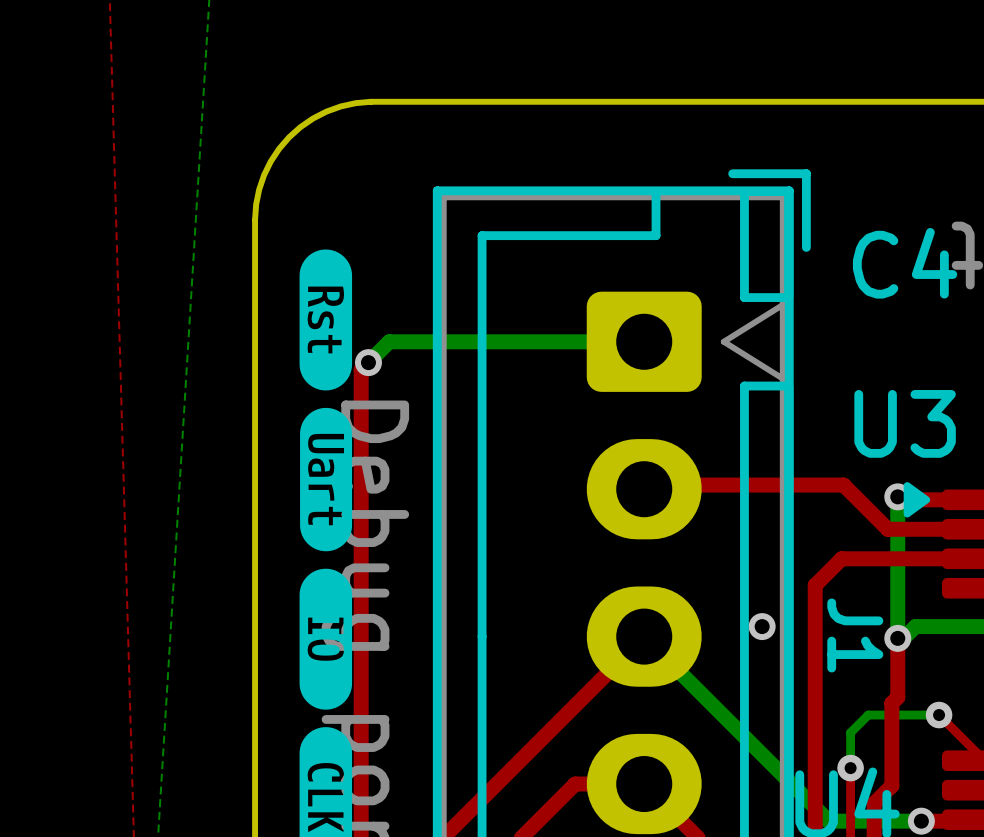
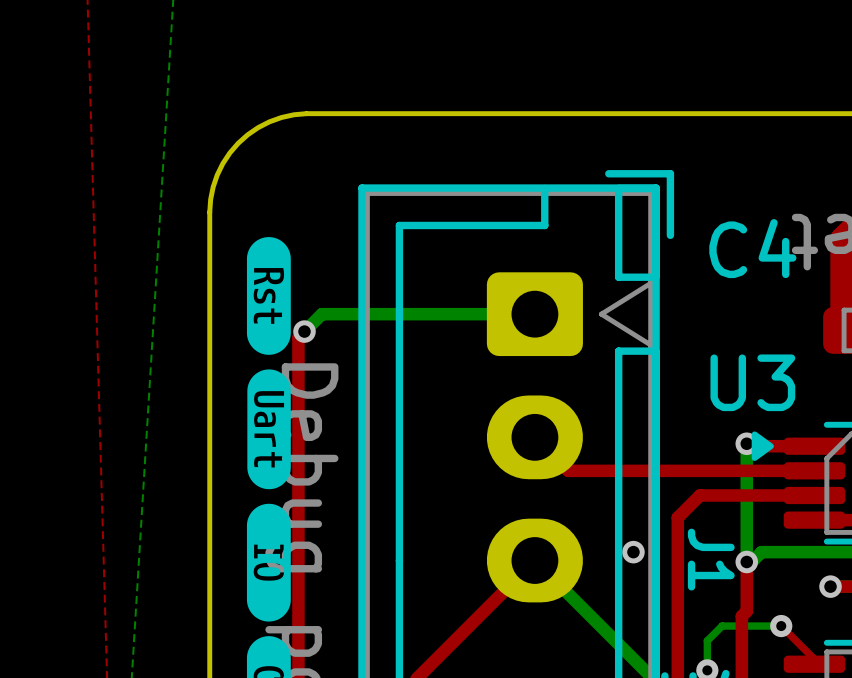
top track: (644, 489) (648, 485) (843, 485) (887, 529) -> (534, 437) (568, 470) (738, 470)

